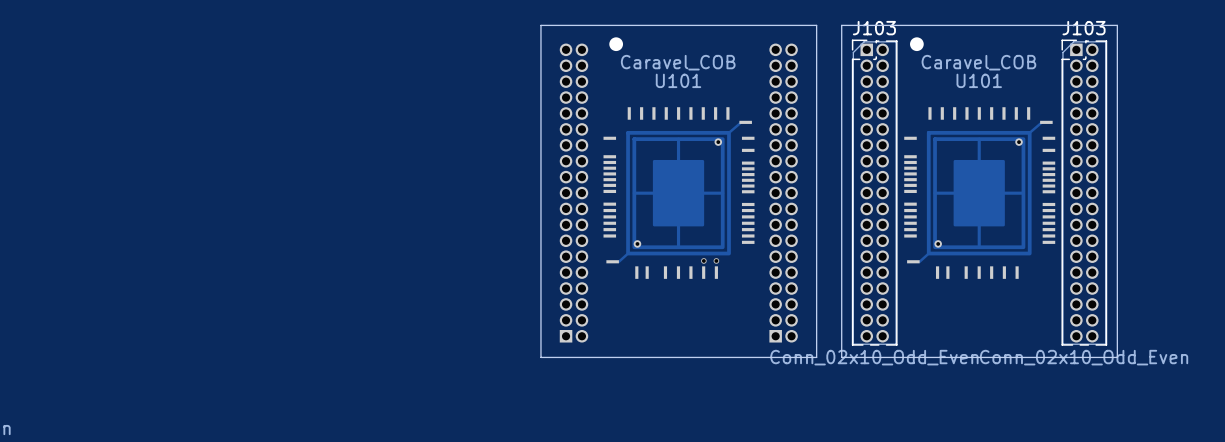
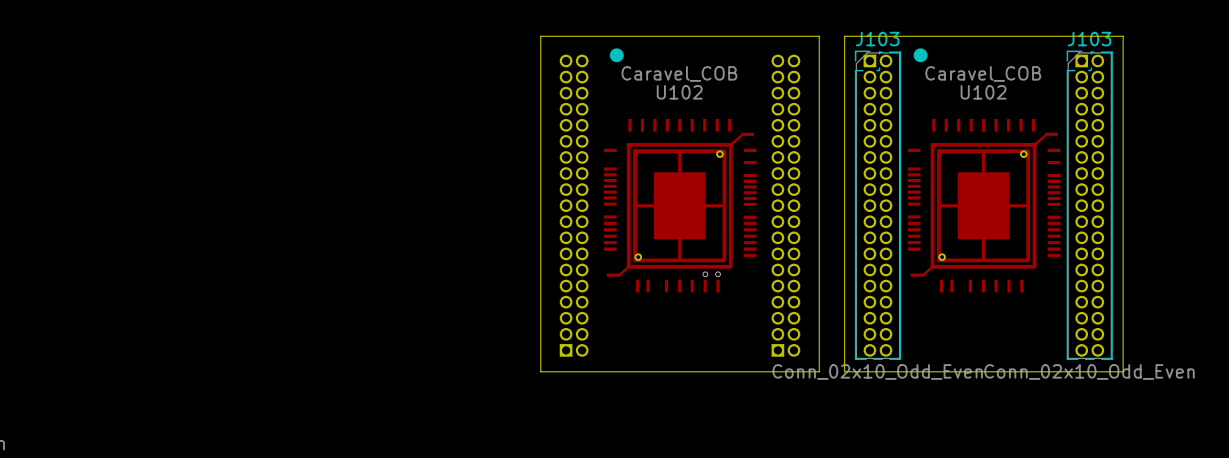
U101 name: U101 (678, 80) -> U102 (679, 92)
U101 name: U101 (979, 80) -> U102 (983, 92)

